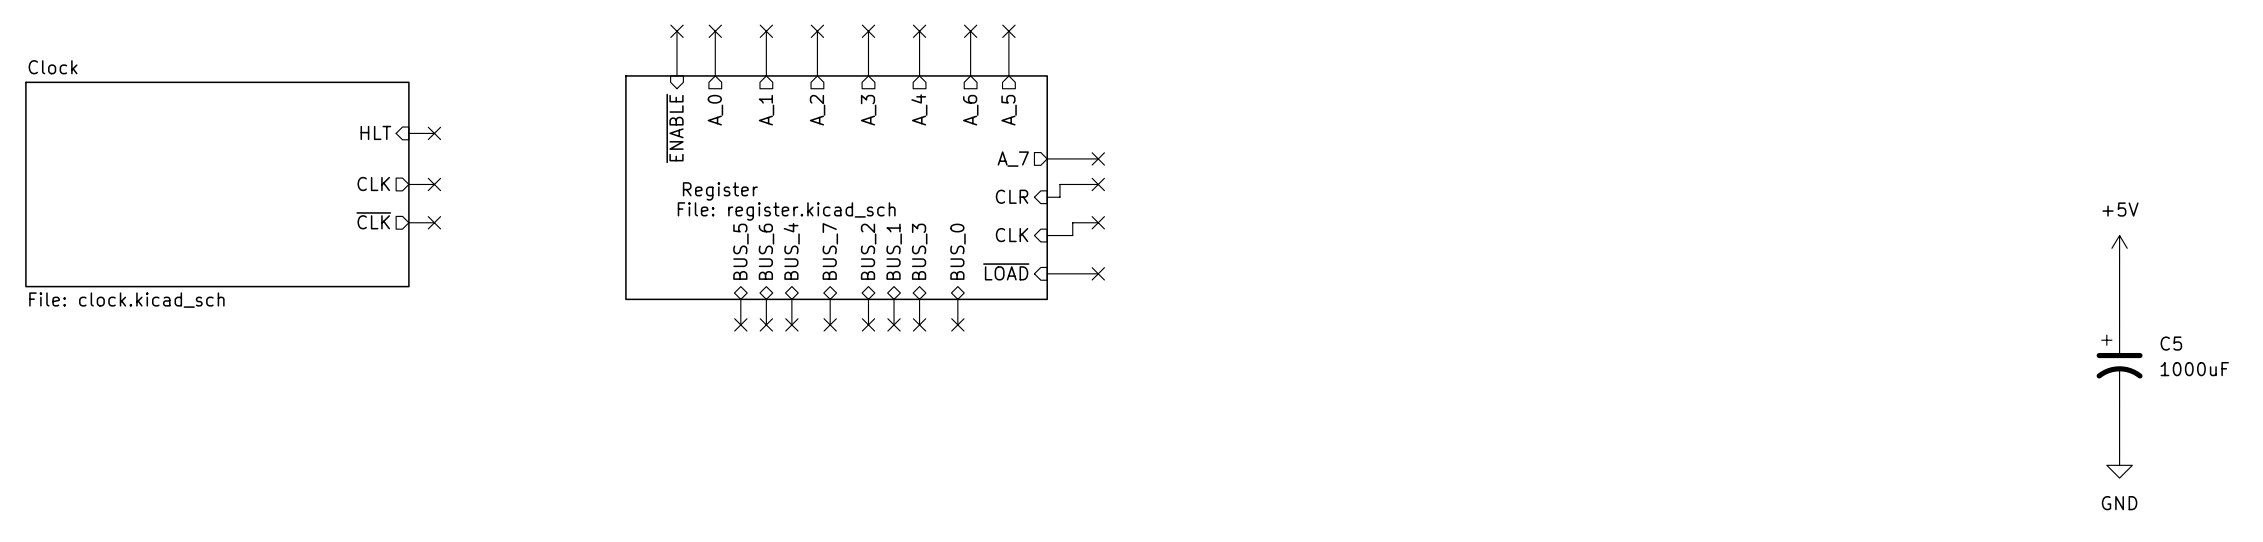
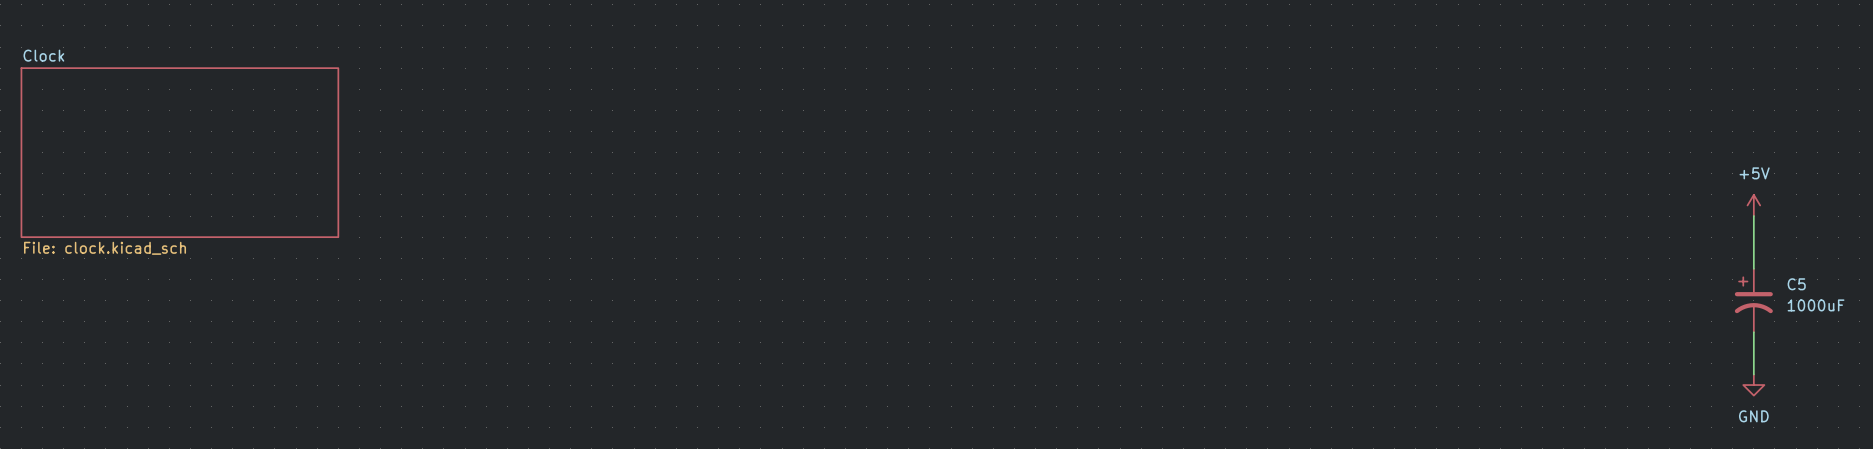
wire: (676, 31) (676, 75) -> none
no-connect mark: (676, 31) -> none
wire: (715, 31) (715, 75) -> none
no-connect mark: (715, 31) -> none
wire: (766, 31) (766, 75) -> none
no-connect mark: (766, 31) -> none
wire: (817, 31) (817, 75) -> none
no-connect mark: (817, 31) -> none
wire: (868, 31) (868, 75) -> none
no-connect mark: (868, 31) -> none
wire: (919, 31) (919, 75) -> none
no-connect mark: (919, 31) -> none
wire: (970, 31) (970, 75) -> none
no-connect mark: (970, 31) -> none
wire: (1008, 31) (1008, 75) -> none
no-connect mark: (1008, 31) -> none
sheet pin: A_4 (919, 109) -> none
sheet pin: A_0 (715, 110) -> none
sheet pin: A_1 (766, 110) -> none
sheet pin: A_2 (817, 110) -> none
sheet pin: A_3 (868, 110) -> none
sheet pin: A_6 (970, 110) -> none
sheet pin: A_5 (1009, 110) -> none
sheet pin: ~{ENABLE} (675, 128) -> none
sheet pin: HLT (375, 132) -> none
wire: (408, 133) (434, 133) -> none
no-connect mark: (434, 133) -> none
wire: (1047, 158) (1098, 158) -> none
no-connect mark: (1098, 158) -> none
sheet pin: A_7 (1013, 159) -> none
sheet pin: CLK (373, 183) -> none
wire: (408, 184) (434, 184) -> none
no-connect mark: (434, 184) -> none
wire: (1098, 184) (1059, 184) (1059, 197) (1047, 197) -> none
no-connect mark: (1098, 184) -> none
sheet Register: File: register.kicad_sch (836, 187) -> none
sheet pin: CLR (1012, 196) -> none
sheet pin: ~{CLK} (373, 220) -> none
wire: (408, 222) (434, 222) -> none
no-connect mark: (434, 222) -> none
wire: (1098, 222) (1072, 222) (1072, 235) (1047, 235) -> none
no-connect mark: (1098, 222) -> none
sheet pin: CLK (1012, 235) -> none
sheet pin: BUS_5 (740, 251) -> none
sheet pin: BUS_6 (766, 251) -> none
sheet pin: BUS_4 (791, 251) -> none
sheet pin: BUS_7 (830, 251) -> none
sheet pin: BUS_2 (868, 251) -> none
sheet pin: BUS_1 (894, 251) -> none
sheet pin: BUS_3 (919, 251) -> none
sheet pin: BUS_0 (957, 251) -> none
sheet pin: ~{LOAD} (1006, 271) -> none
wire: (1047, 273) (1098, 273) -> none
no-connect mark: (1098, 273) -> none
wire: (740, 299) (740, 324) -> none
wire: (766, 299) (766, 324) -> none
wire: (791, 299) (791, 324) -> none
wire: (830, 299) (830, 324) -> none
wire: (868, 299) (868, 324) -> none
wire: (894, 299) (894, 324) -> none
wire: (919, 299) (919, 324) -> none
wire: (957, 299) (957, 324) -> none
no-connect mark: (740, 324) -> none
no-connect mark: (766, 324) -> none
no-connect mark: (791, 324) -> none
no-connect mark: (830, 324) -> none
no-connect mark: (868, 324) -> none
no-connect mark: (894, 324) -> none
no-connect mark: (919, 324) -> none
no-connect mark: (957, 324) -> none

